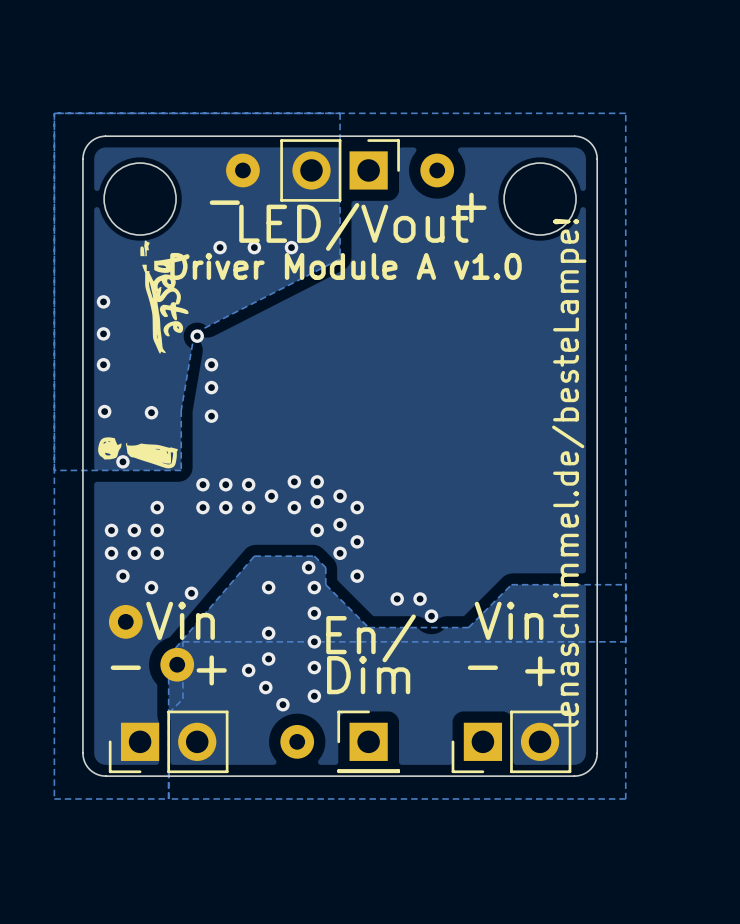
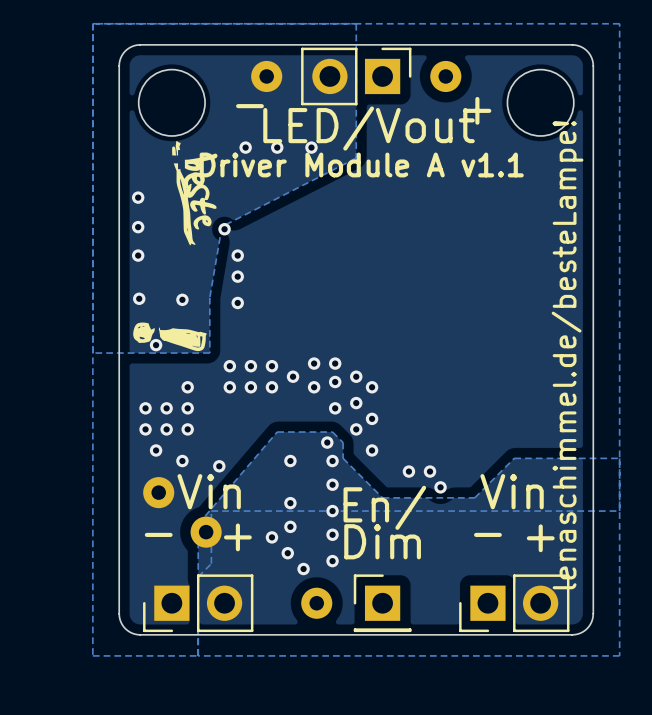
text: Driver Module A v1.0 (346, 266) -> Driver Module A v1.1 (361, 164)

